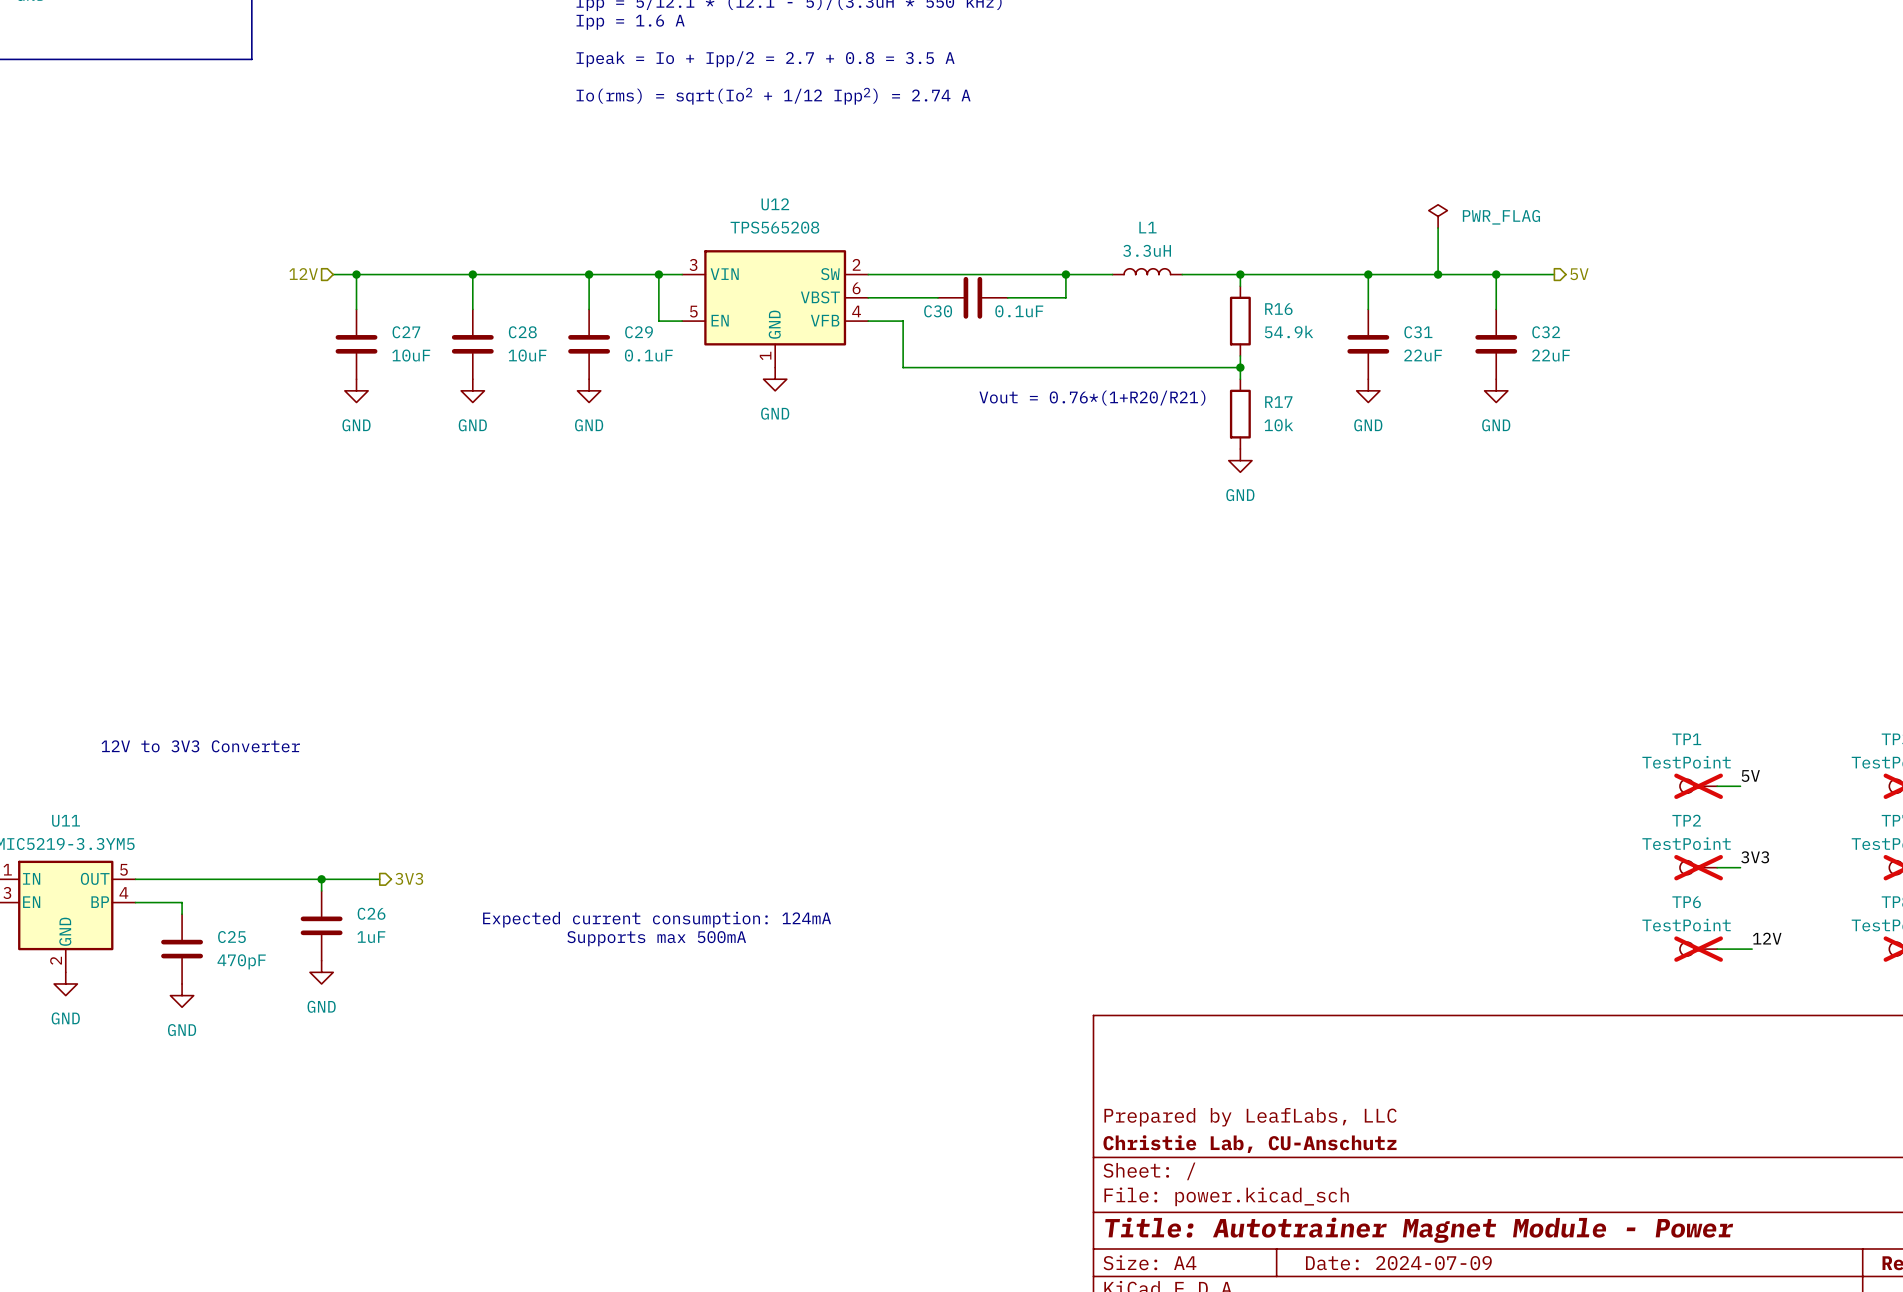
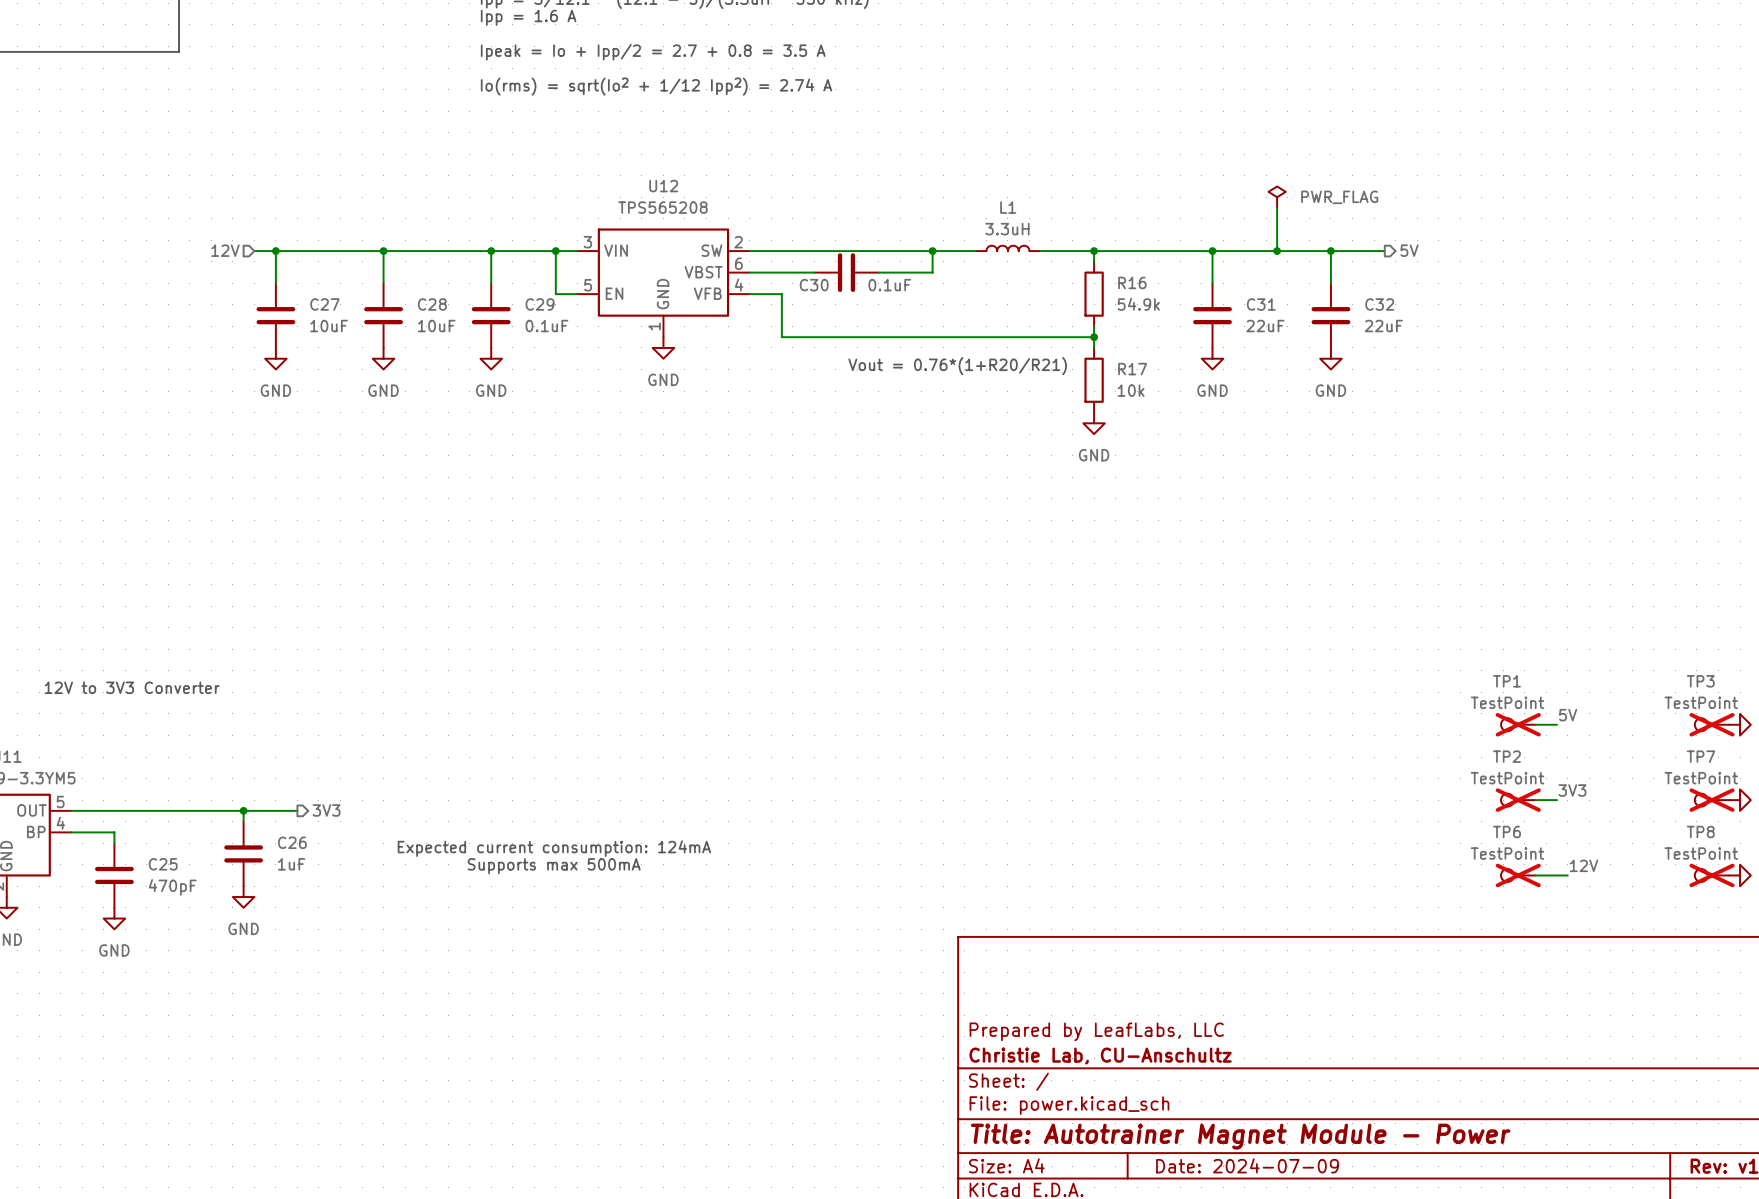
title block: Christie Lab, CU-Anschutz (1250, 1144) -> Christie Lab, CU-Anschultz (1100, 1056)

